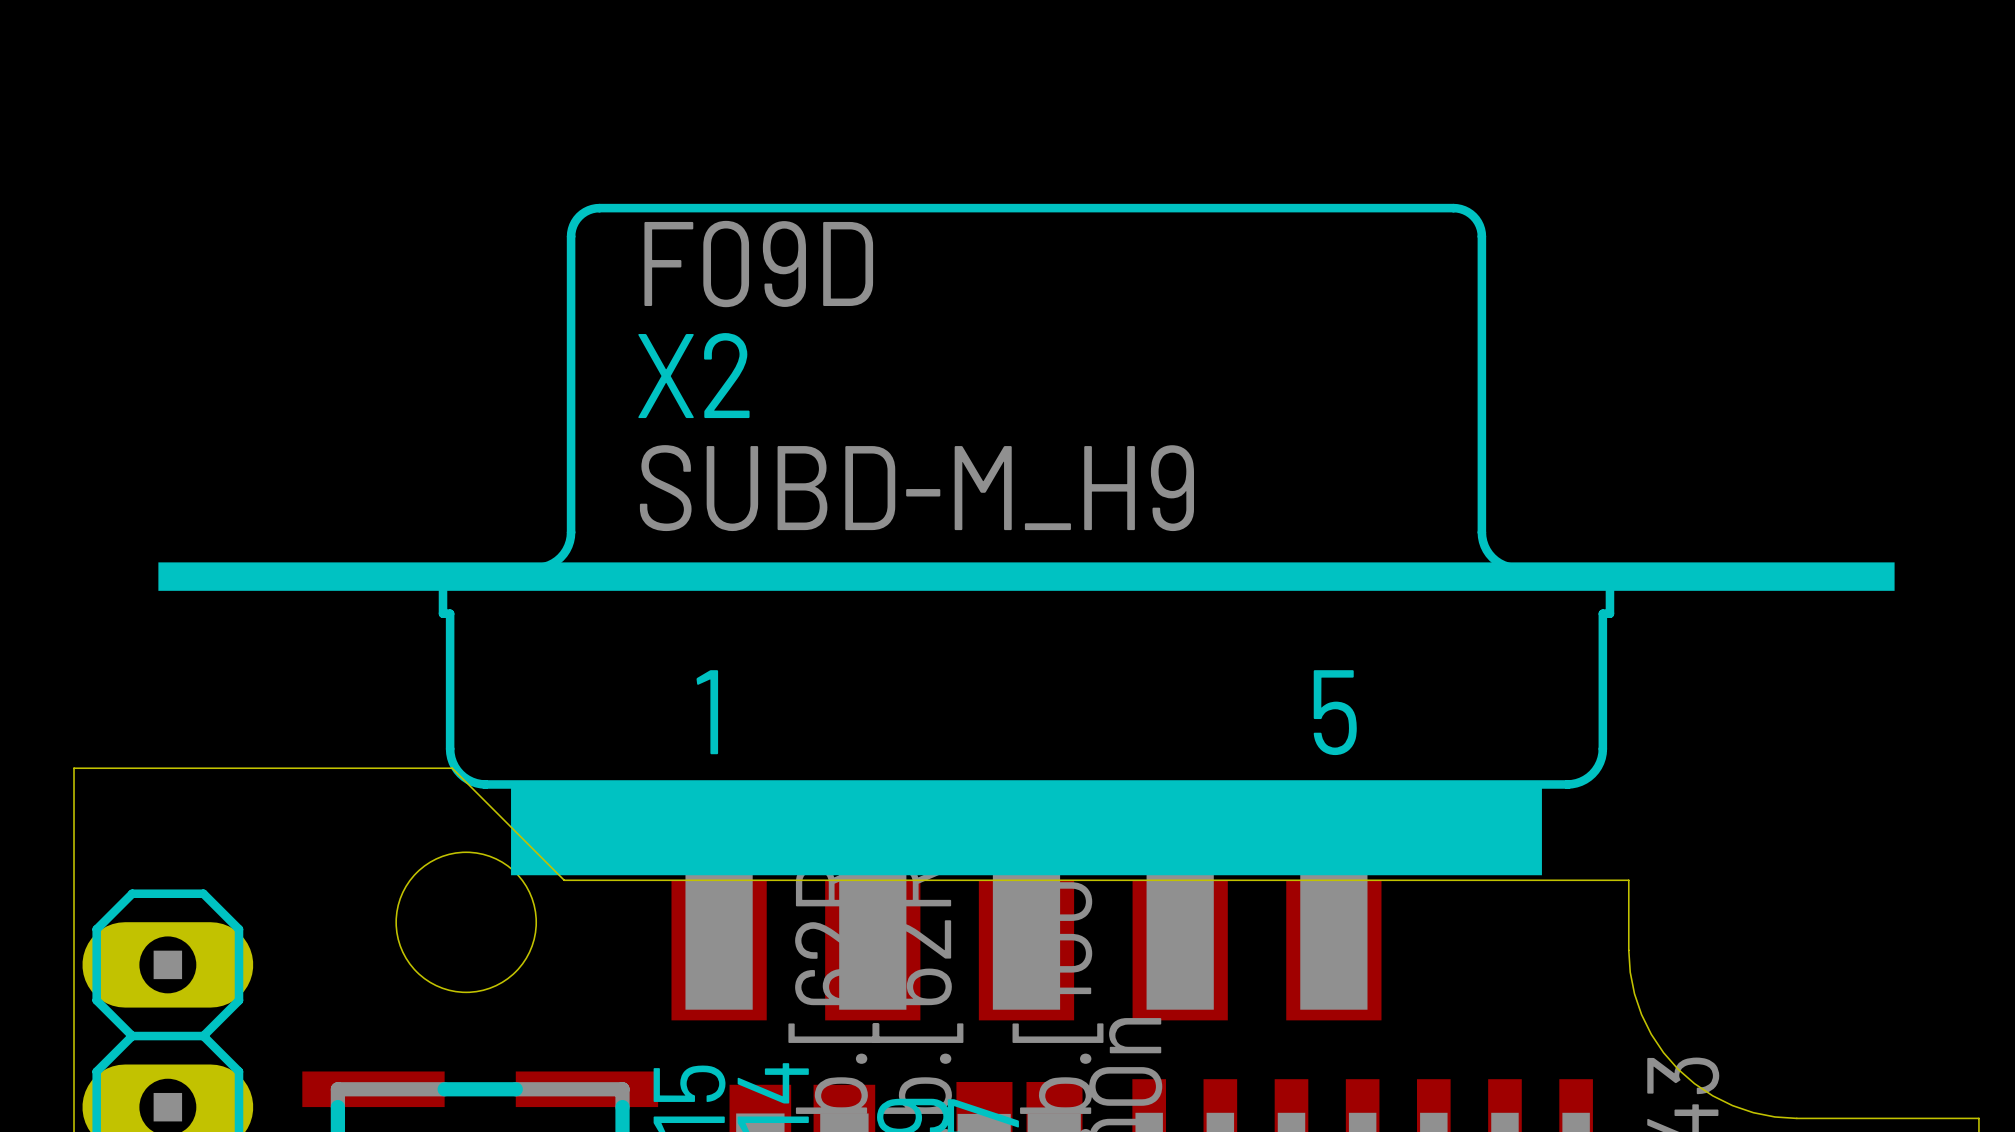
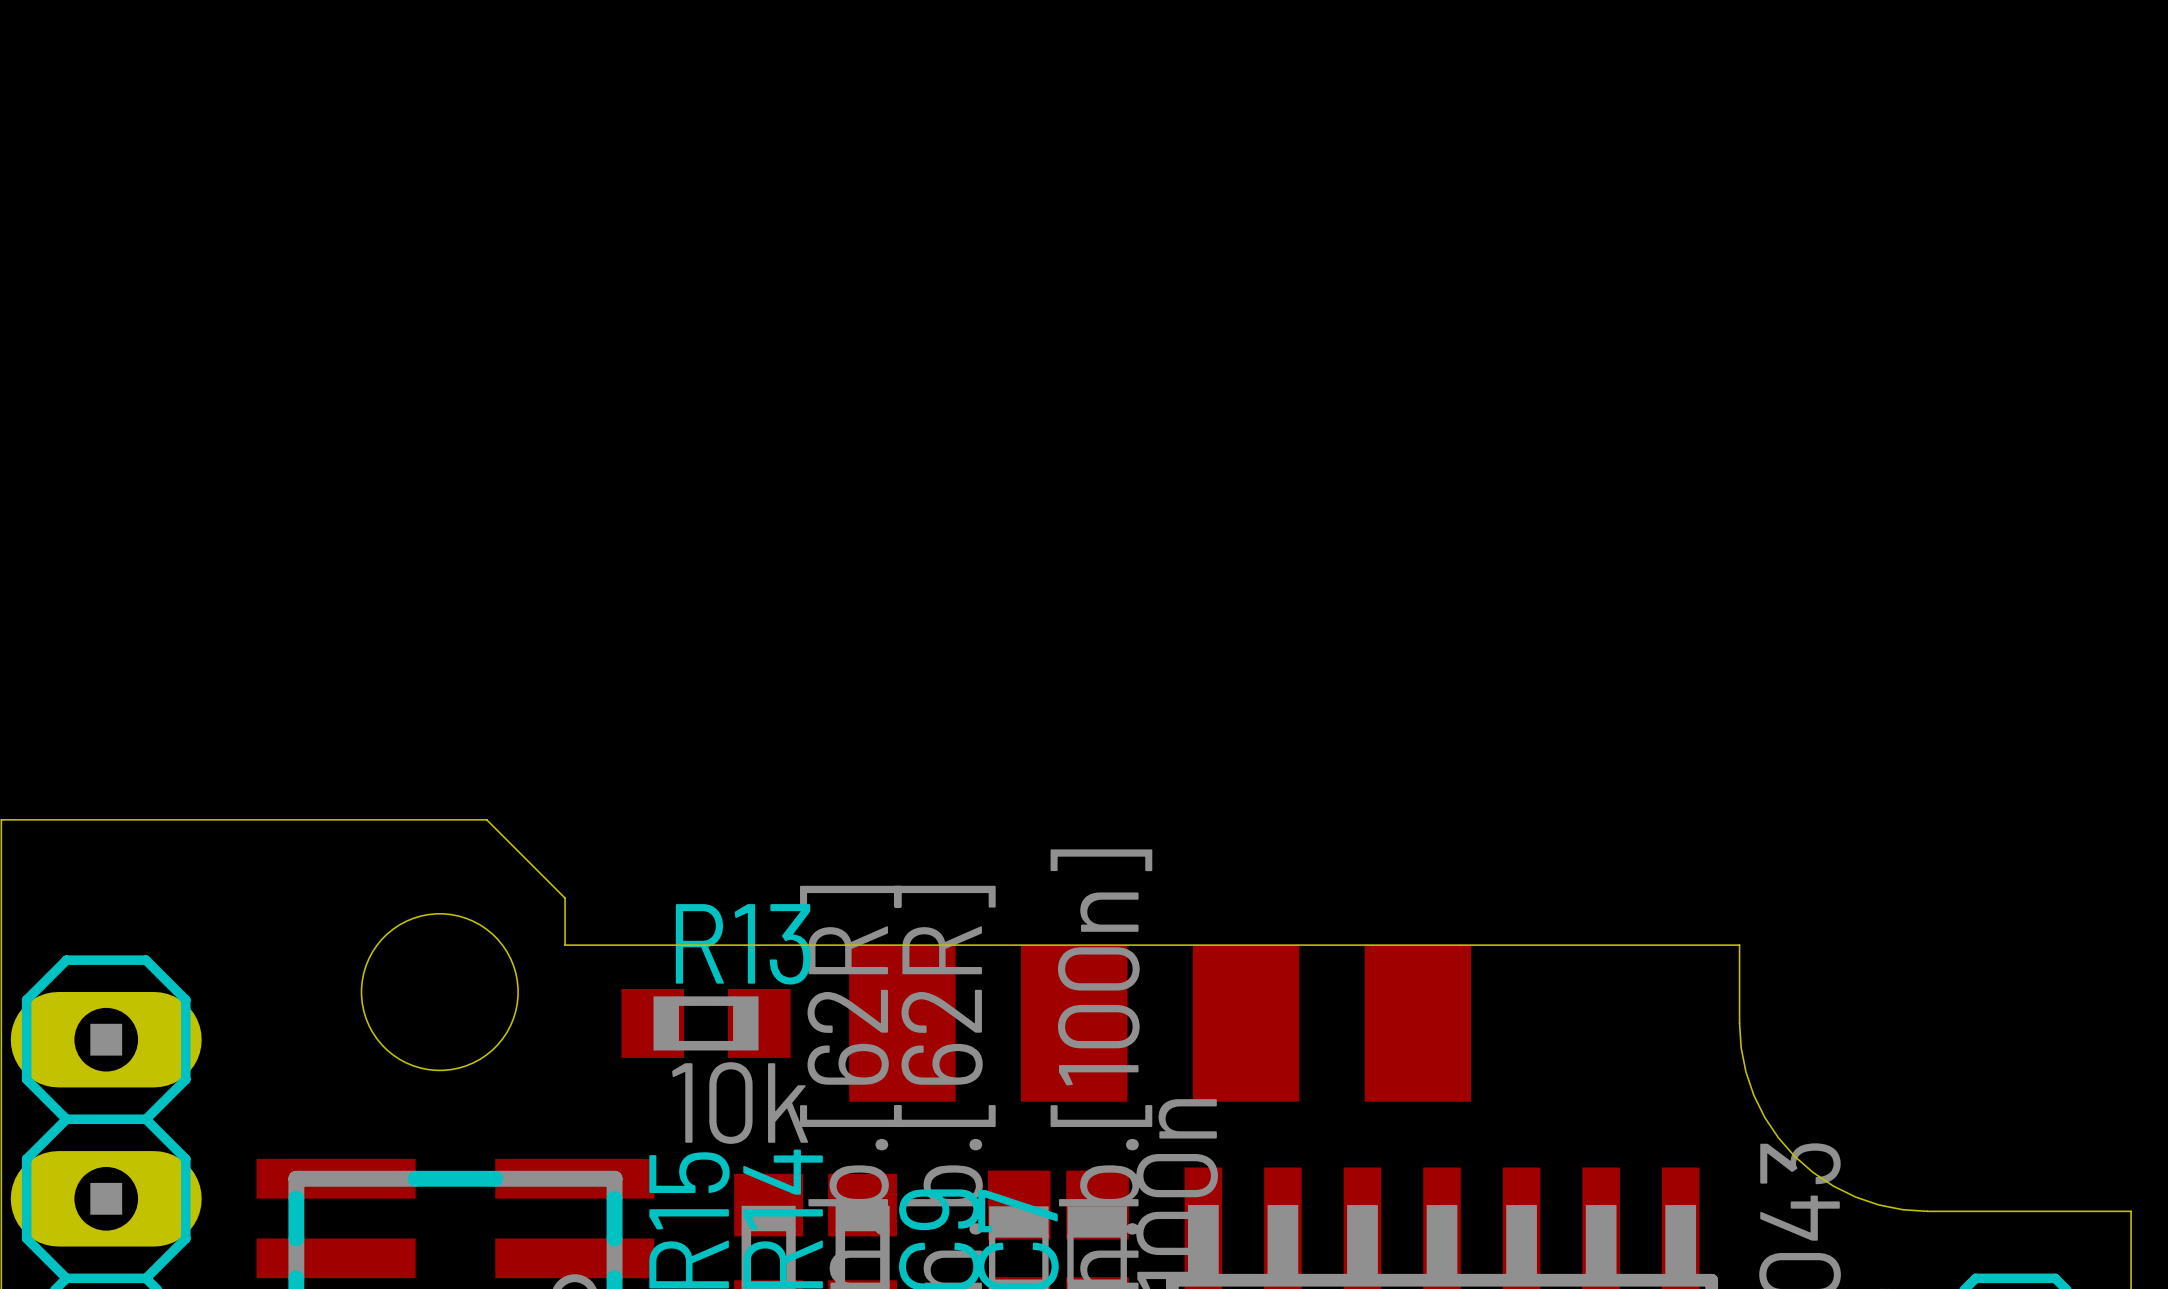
X2: SUBD-M_H9 (1026, 612) -> none
board edge: (452, 768) (564, 880) (578, 880) -> (424, 819) (486, 819) (565, 898) (565, 945)
R13: none -> 10k (706, 1023)
part: none -> (1160, 1023)

